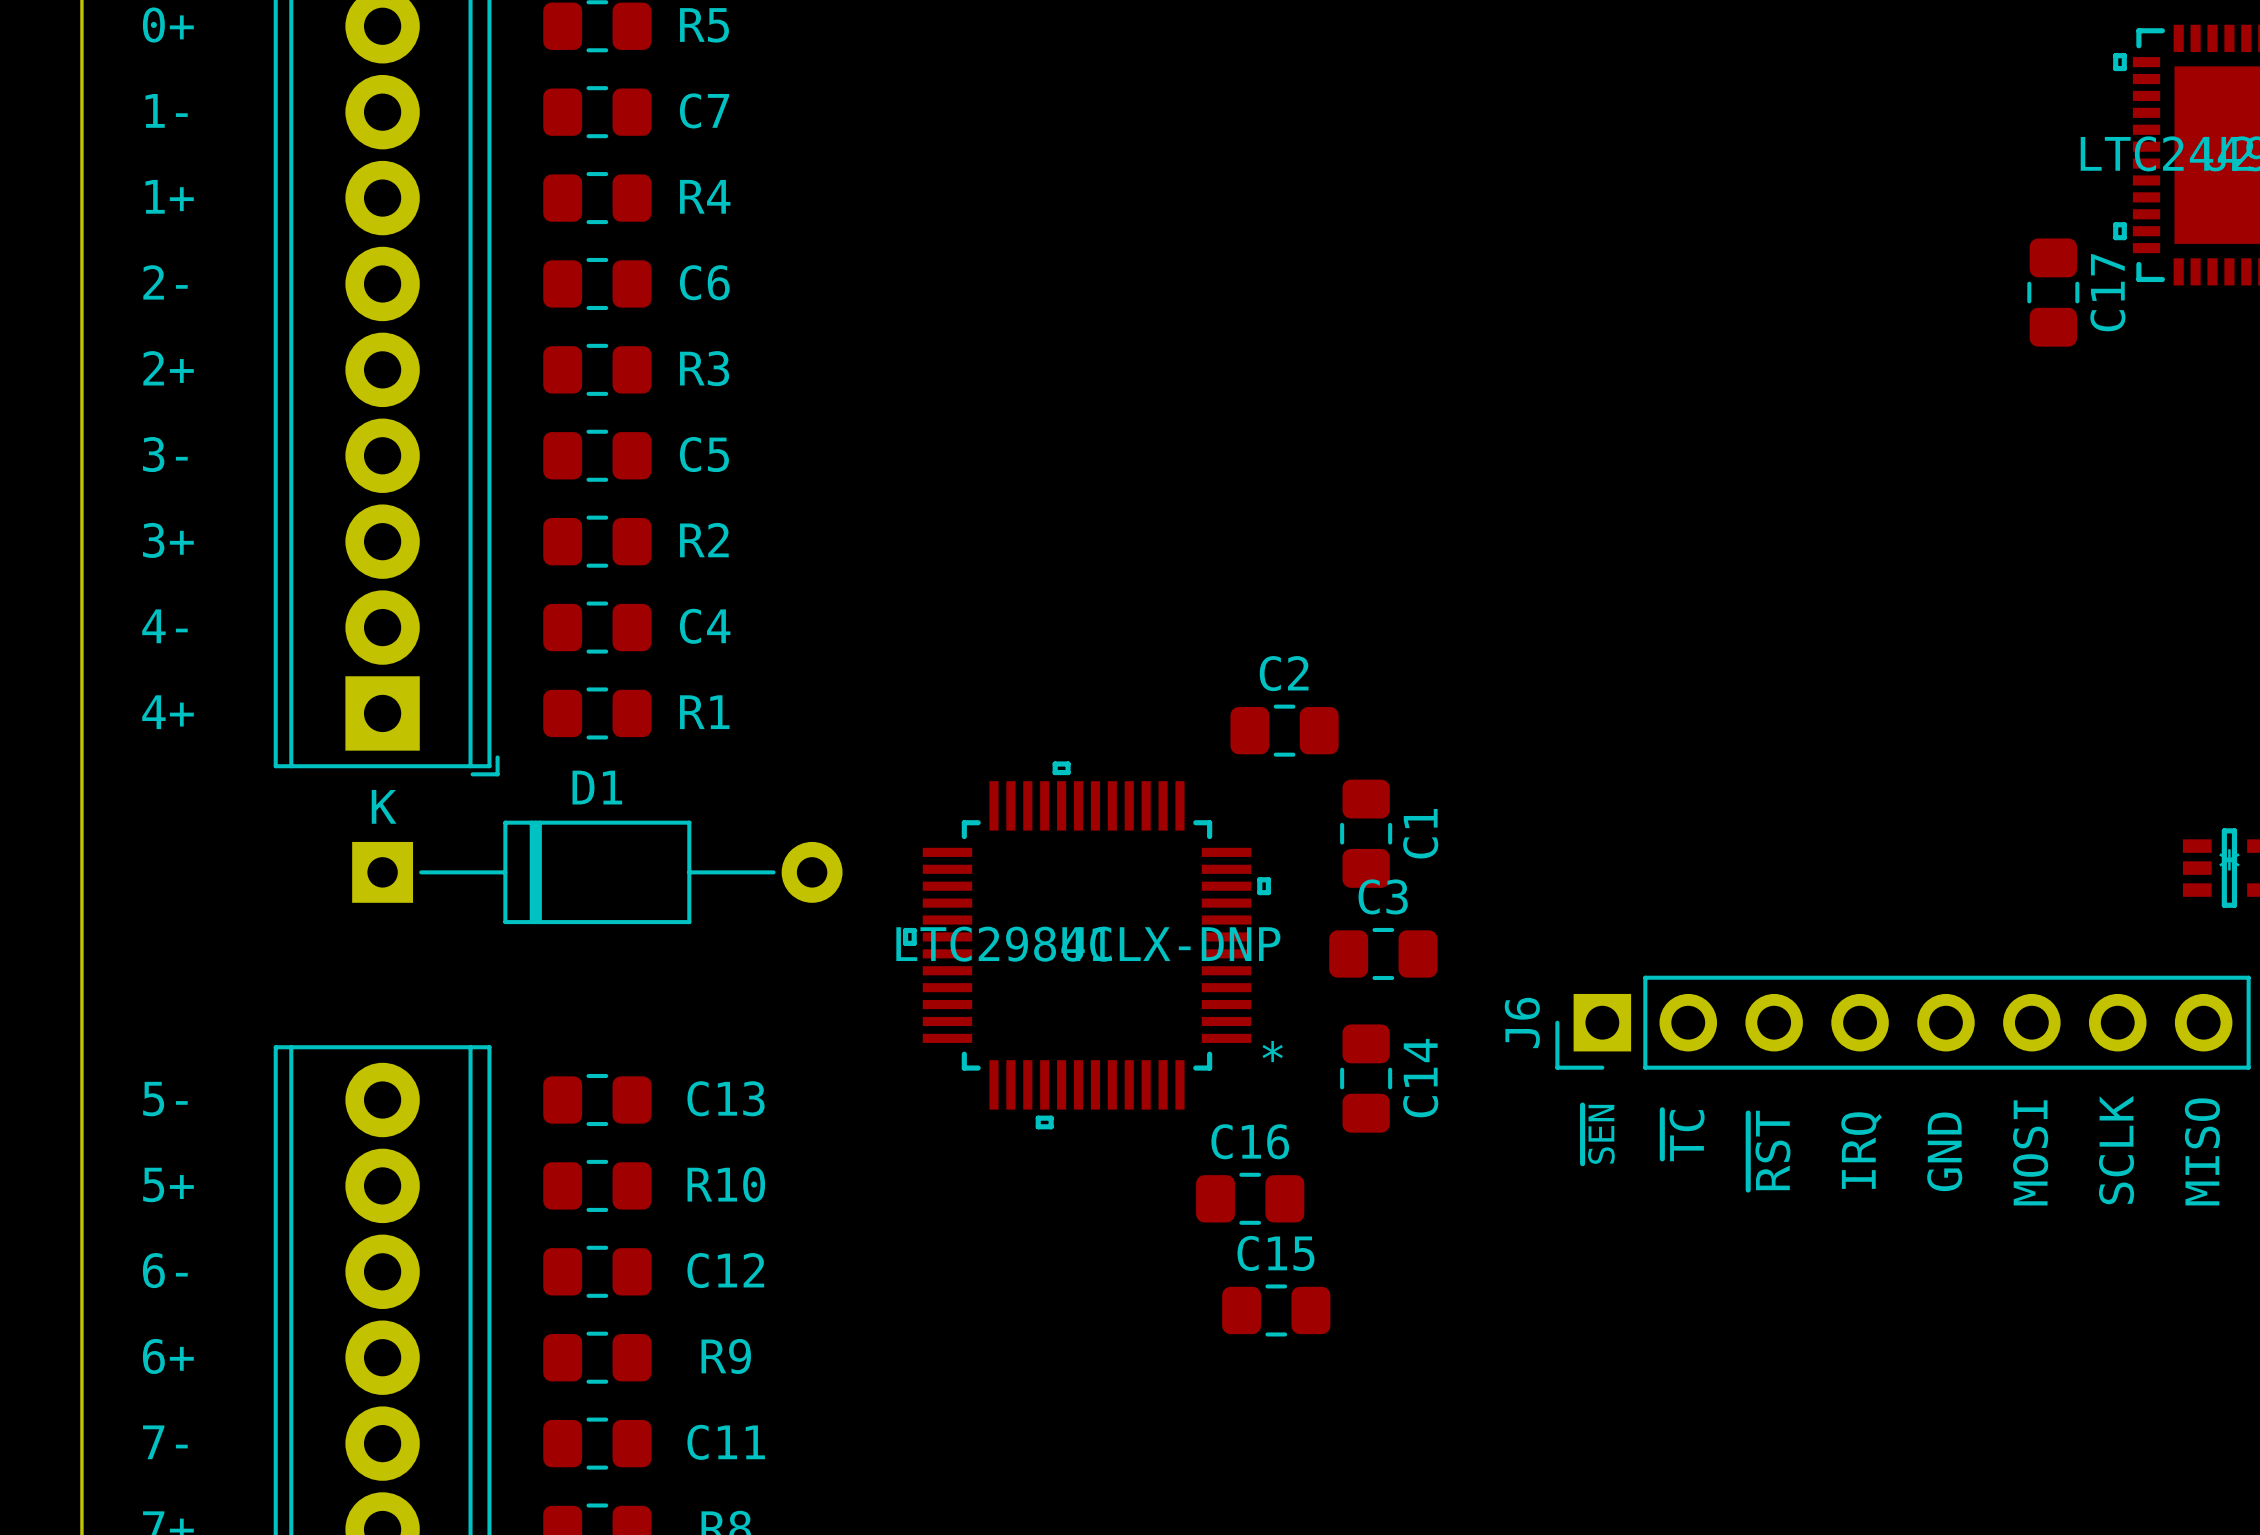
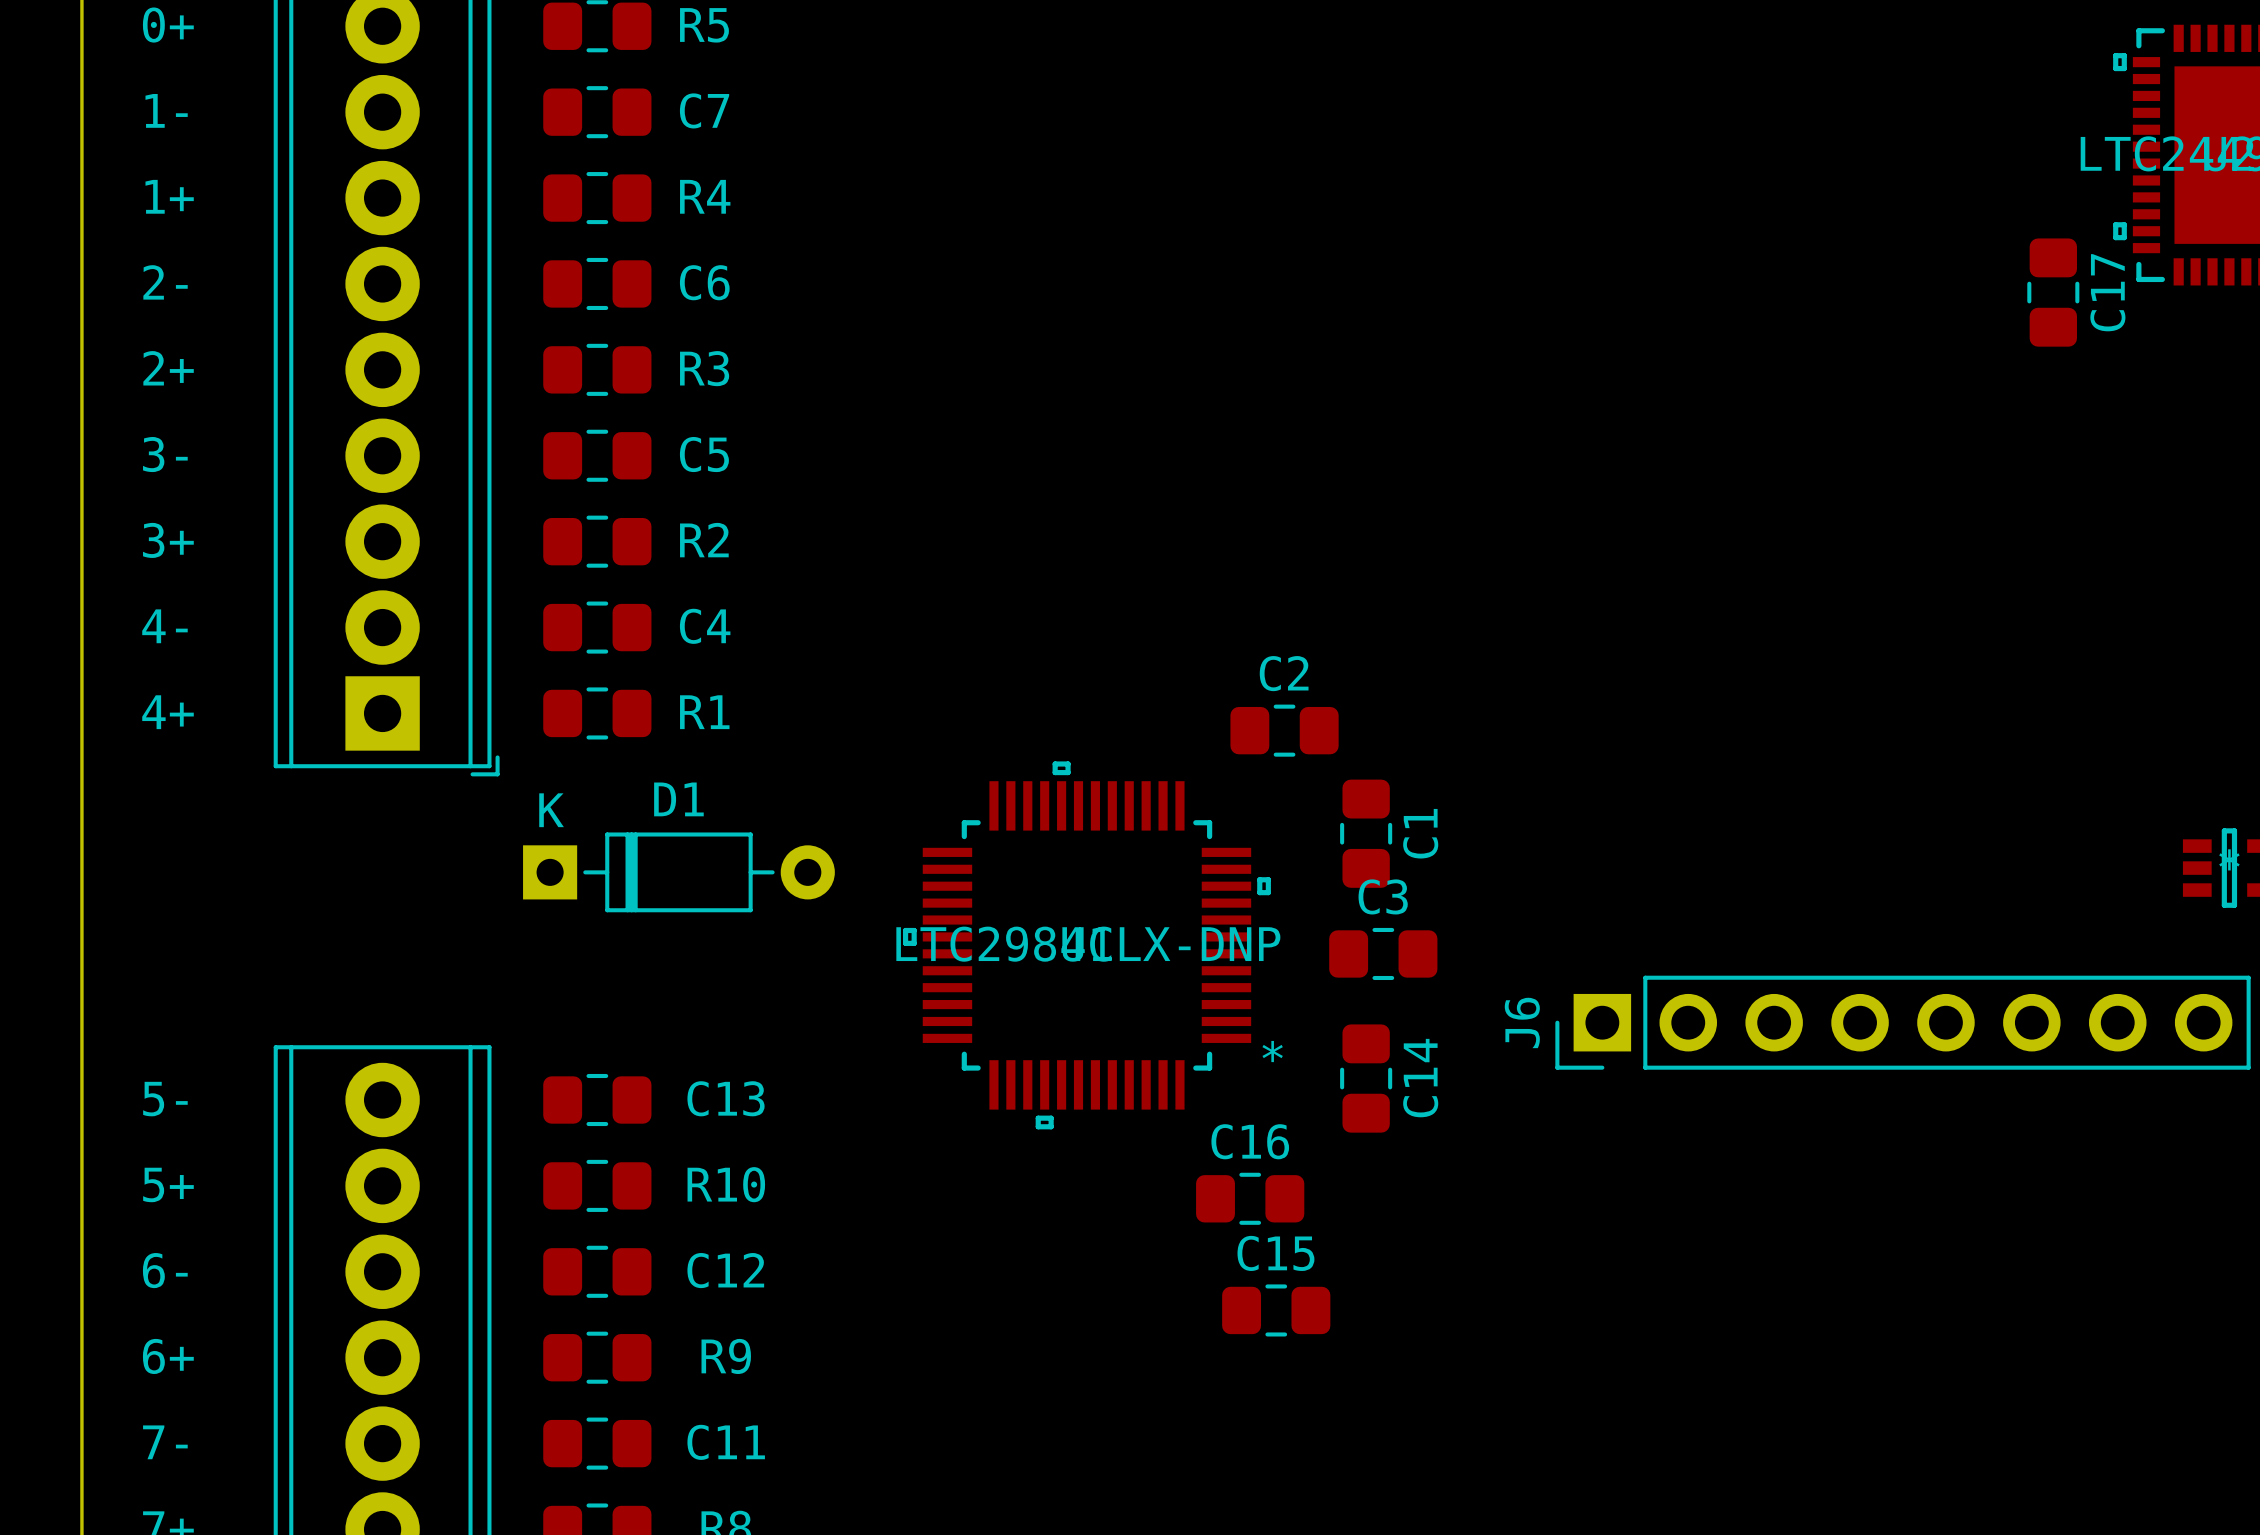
D1 footprint: [352, 820, 843, 925] -> [523, 832, 835, 913]
text: ~{SEN} (1598, 1134) -> none
text: ~{TC} (1683, 1135) -> none
text: ~{RST} (1769, 1150) -> none
text: IRQ (1861, 1150) -> none
text: SCLK (2116, 1150) -> none
text: GND (1944, 1151) -> none
text: MISO (2202, 1151) -> none
text: MOSI (2030, 1152) -> none

